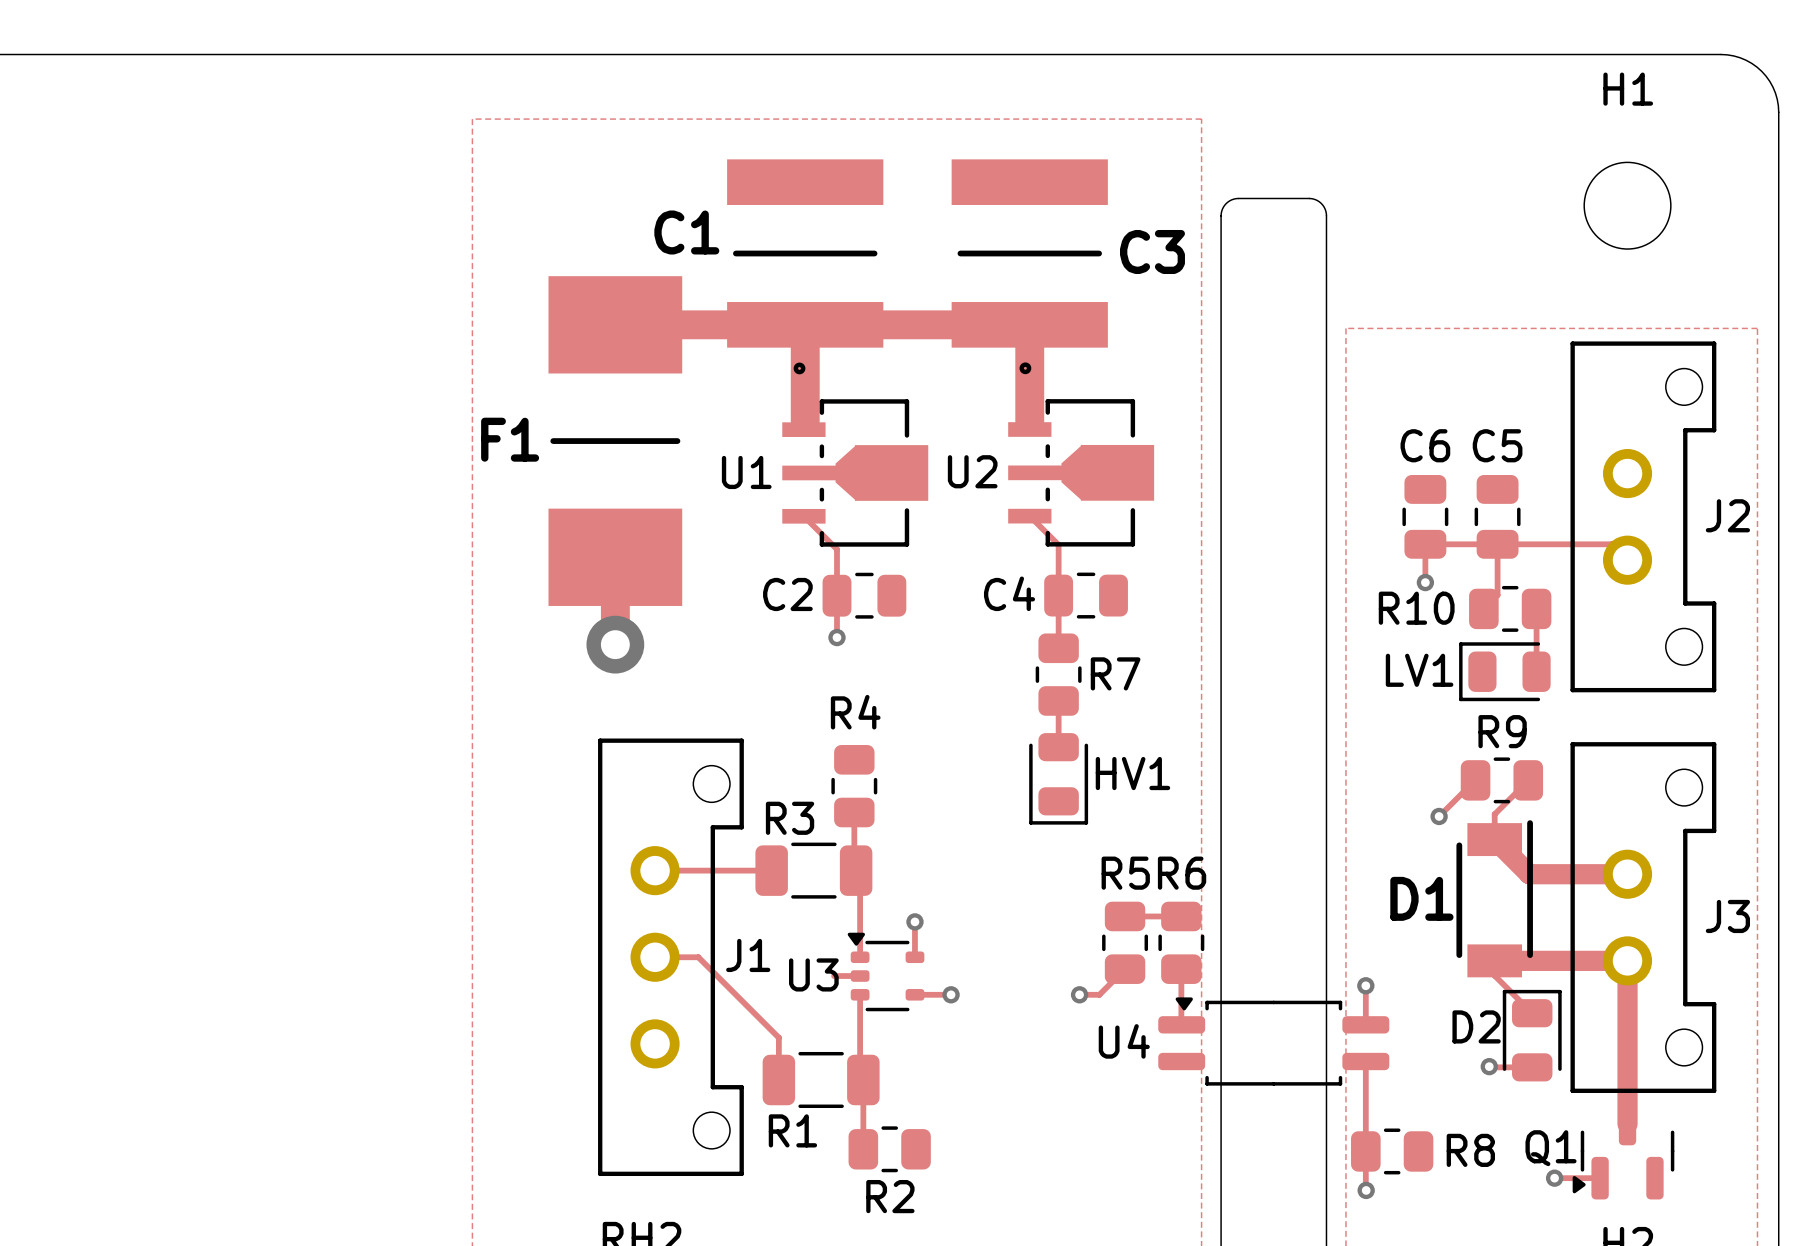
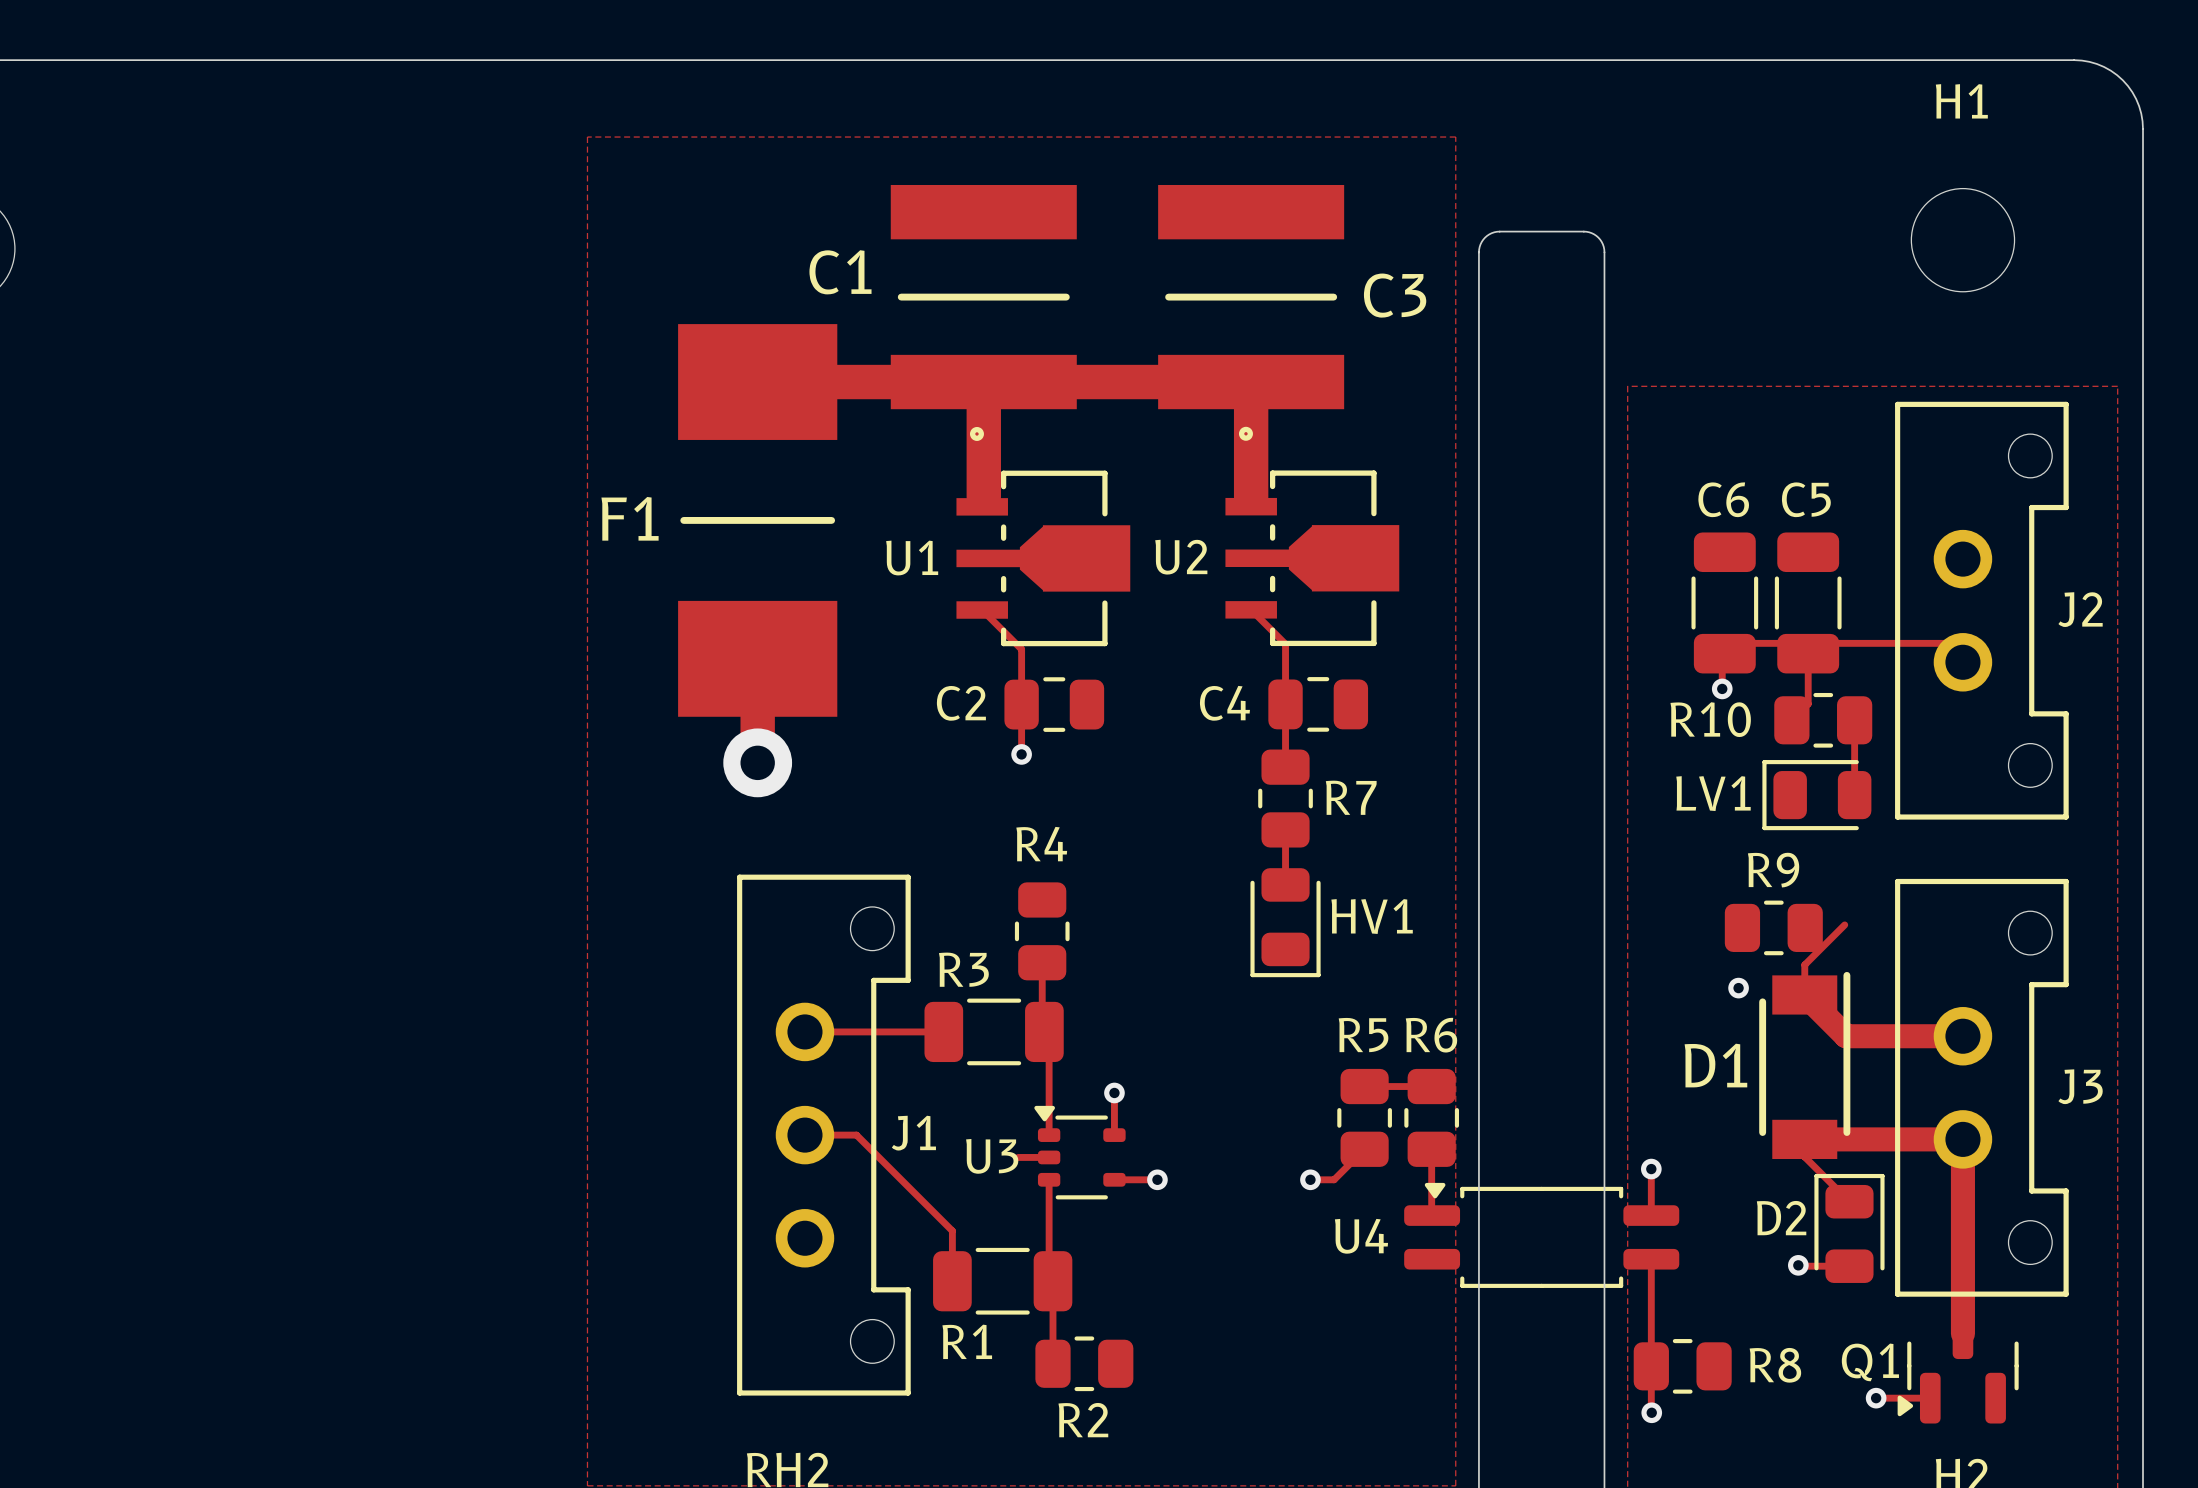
C6 name position: C6 (1425, 445) -> C6 (1723, 499)
C5 name position: C5 (1497, 445) -> C5 (1806, 499)
C6 footprint: [1402, 474, 1449, 559] -> [1691, 532, 1759, 674]
C5 footprint: [1474, 474, 1521, 559] -> [1774, 532, 1842, 674]
track: (1475, 780) (1439, 816) -> none
R9 position: (1501, 780) -> (1773, 927)
via position: (1439, 816) -> (1738, 988)

